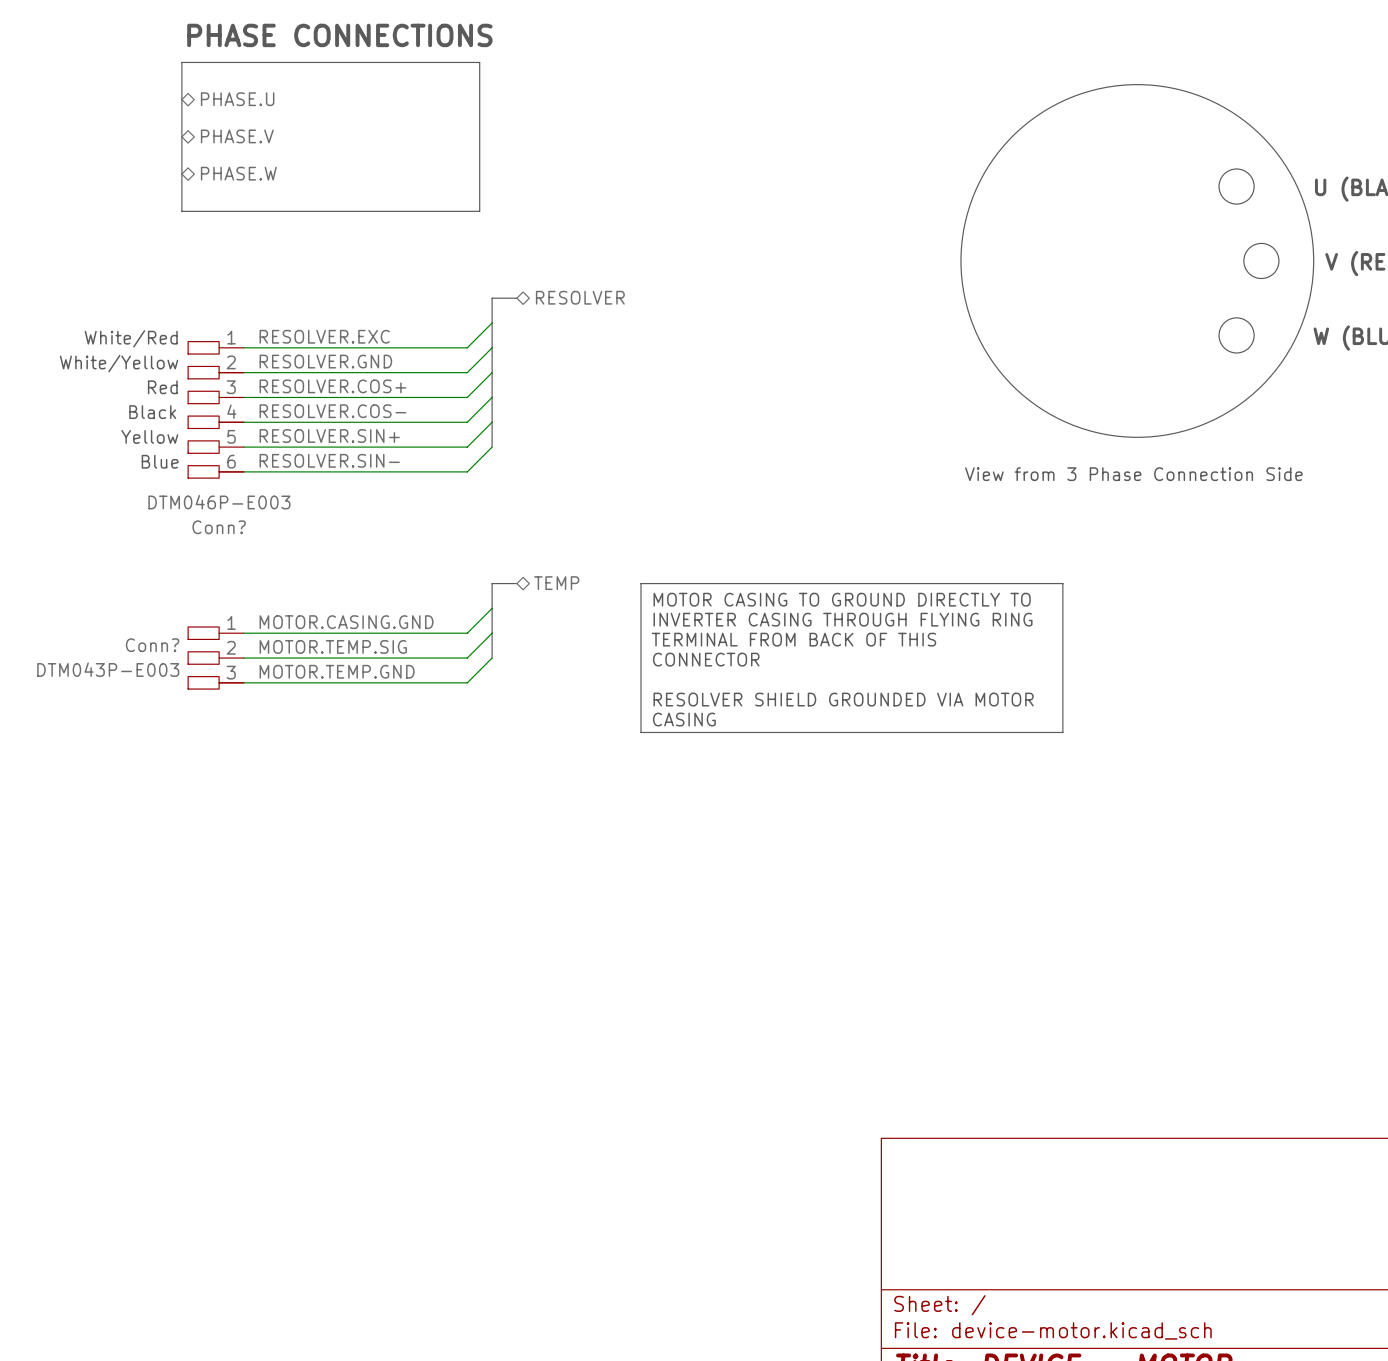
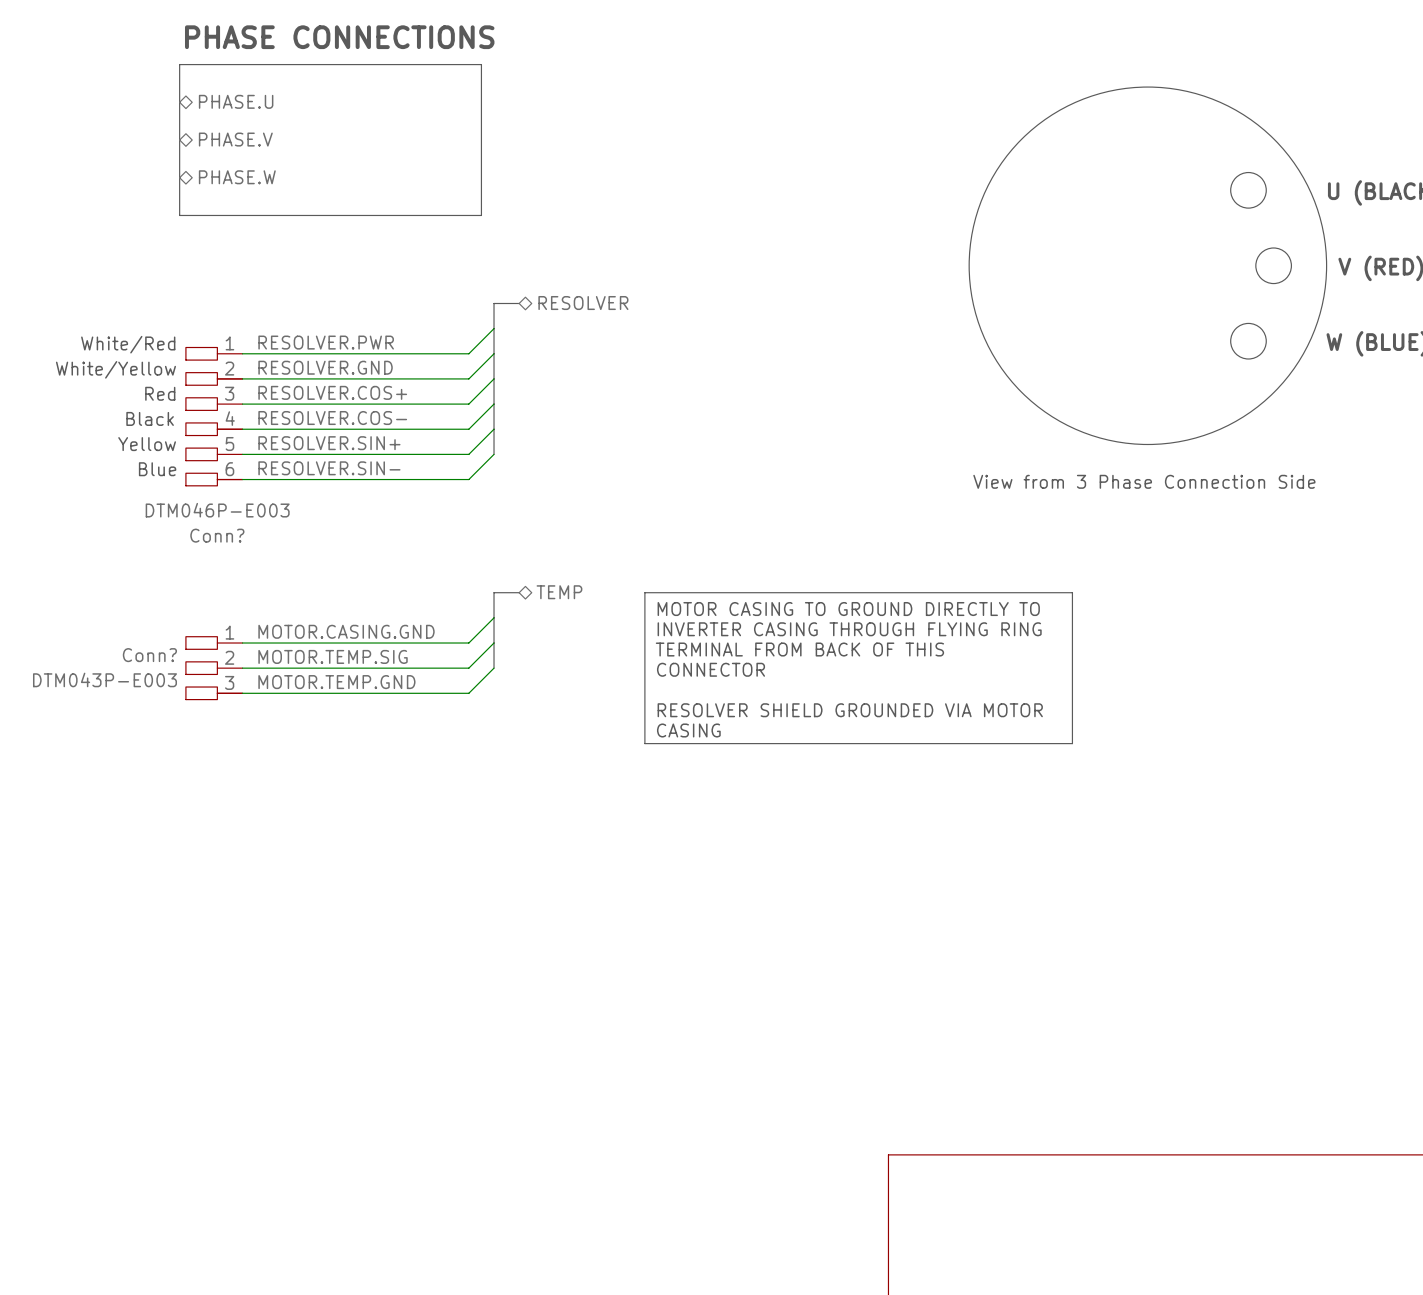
label: RESOLVER.EXC (324, 336) -> RESOLVER.PWR (326, 342)

